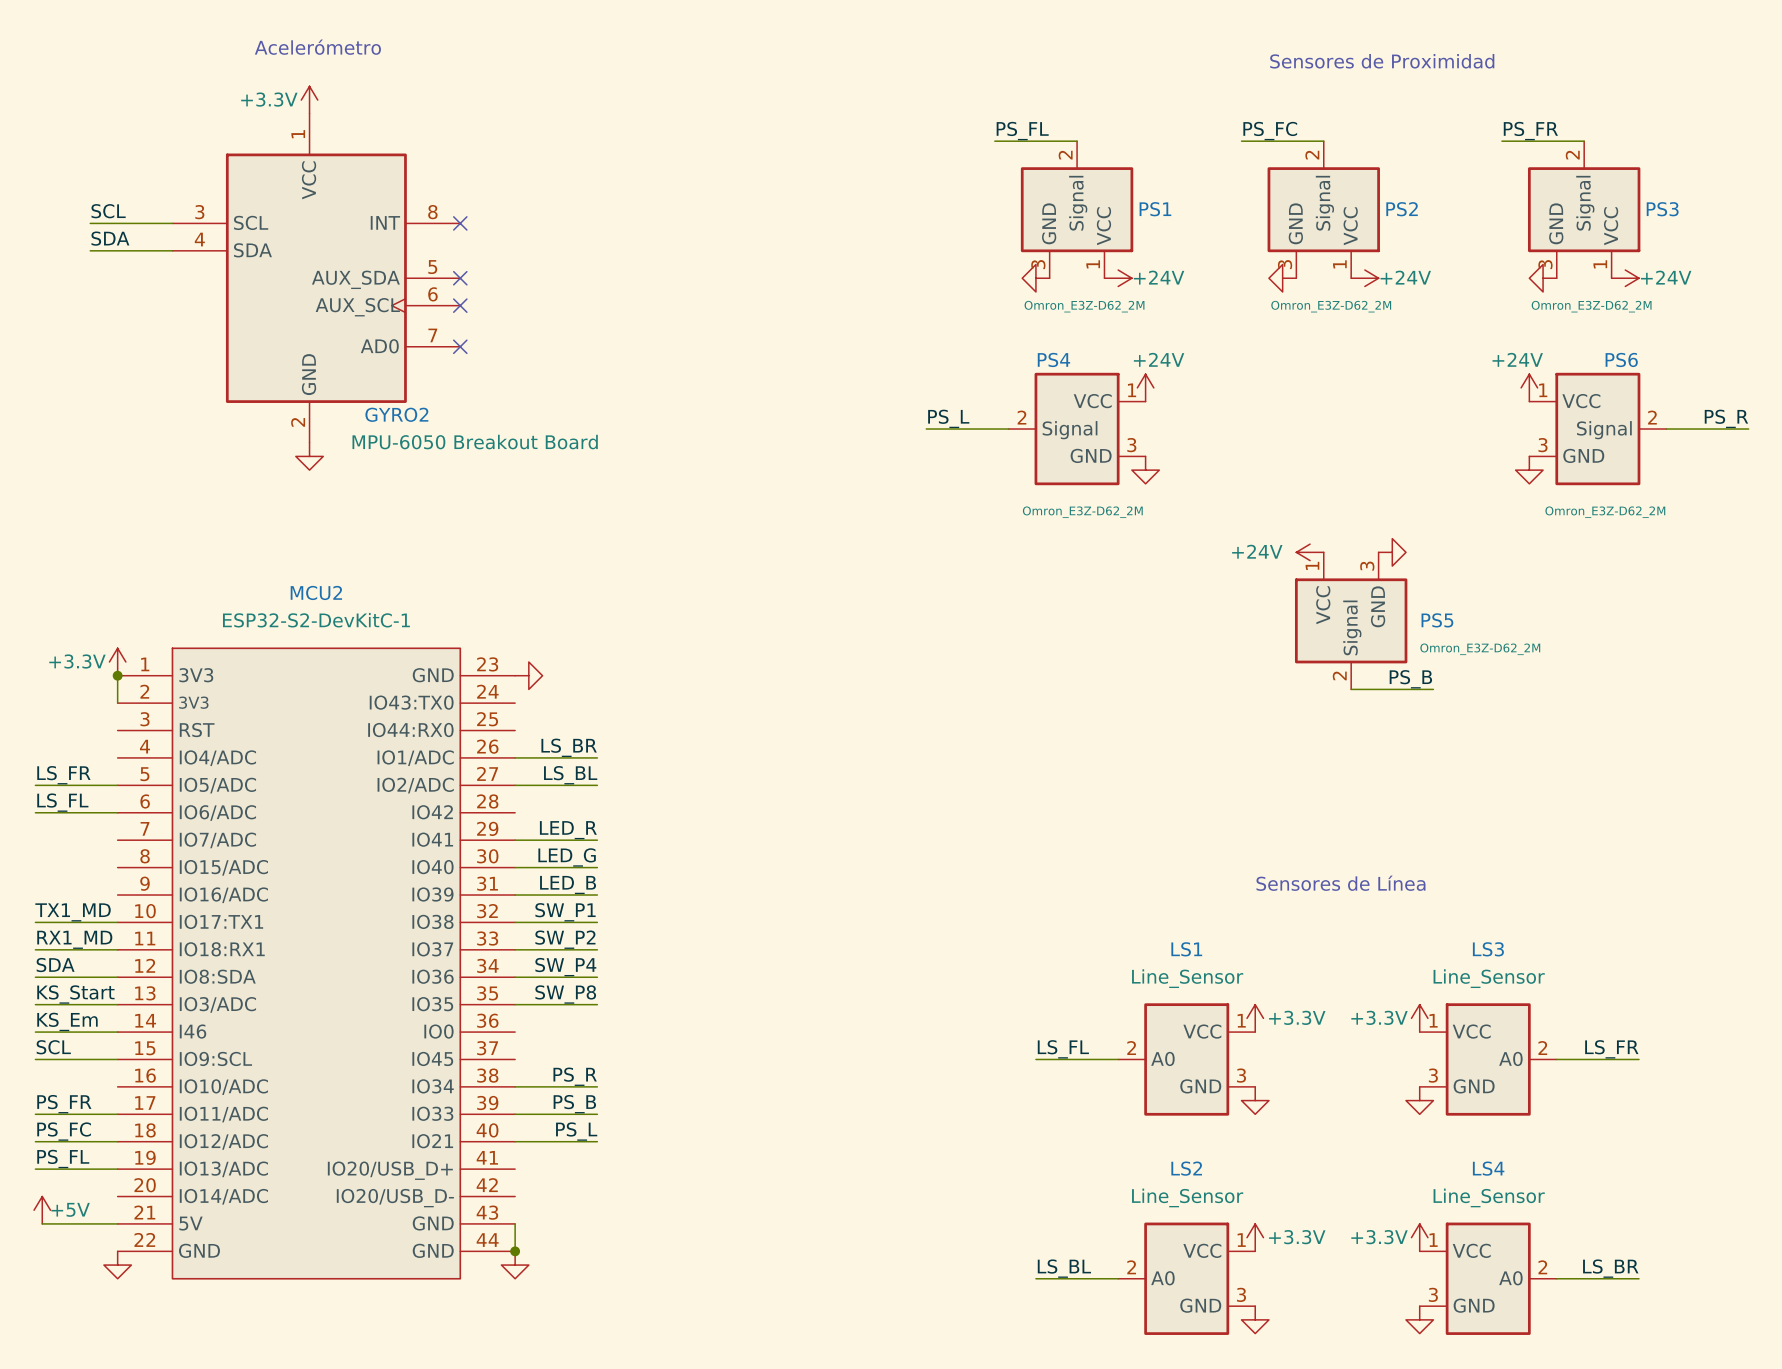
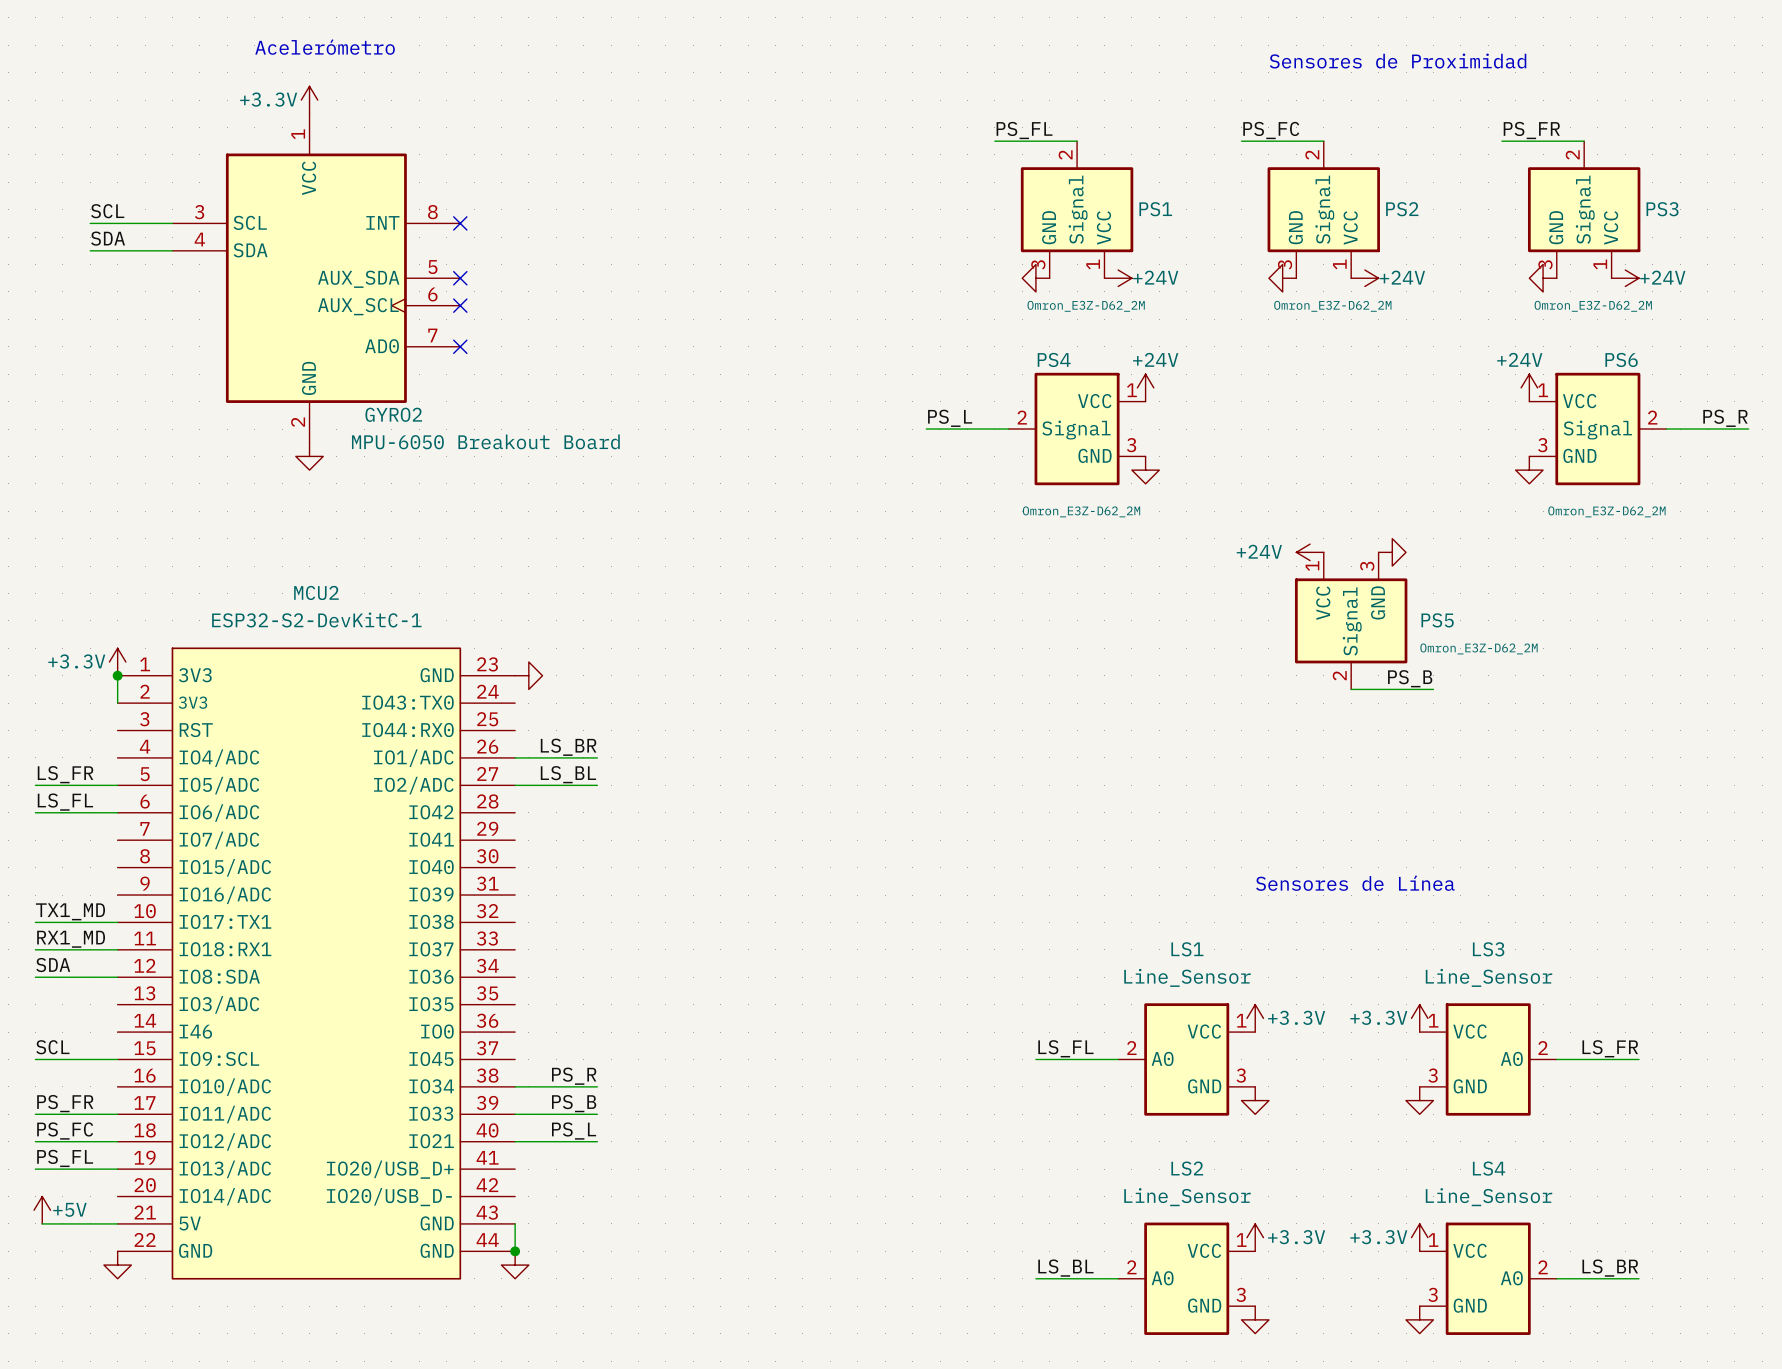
label: LED_R (568, 830) -> none
wire: (515, 840) (597, 840) -> none
label: LED_G (567, 857) -> none
wire: (515, 867) (597, 867) -> none
label: LED_B (568, 884) -> none
wire: (515, 895) (597, 895) -> none
label: SW_P1 (565, 912) -> none
wire: (515, 922) (597, 922) -> none
label: SW_P2 (565, 939) -> none
wire: (515, 949) (597, 949) -> none
label: SW_P4 (565, 967) -> none
wire: (515, 977) (597, 977) -> none
label: KS_Start (75, 994) -> none
label: SW_P8 (565, 994) -> none
wire: (35, 1004) (117, 1004) -> none
wire: (515, 1004) (597, 1004) -> none
label: KS_Em (67, 1021) -> none
wire: (35, 1032) (117, 1032) -> none

